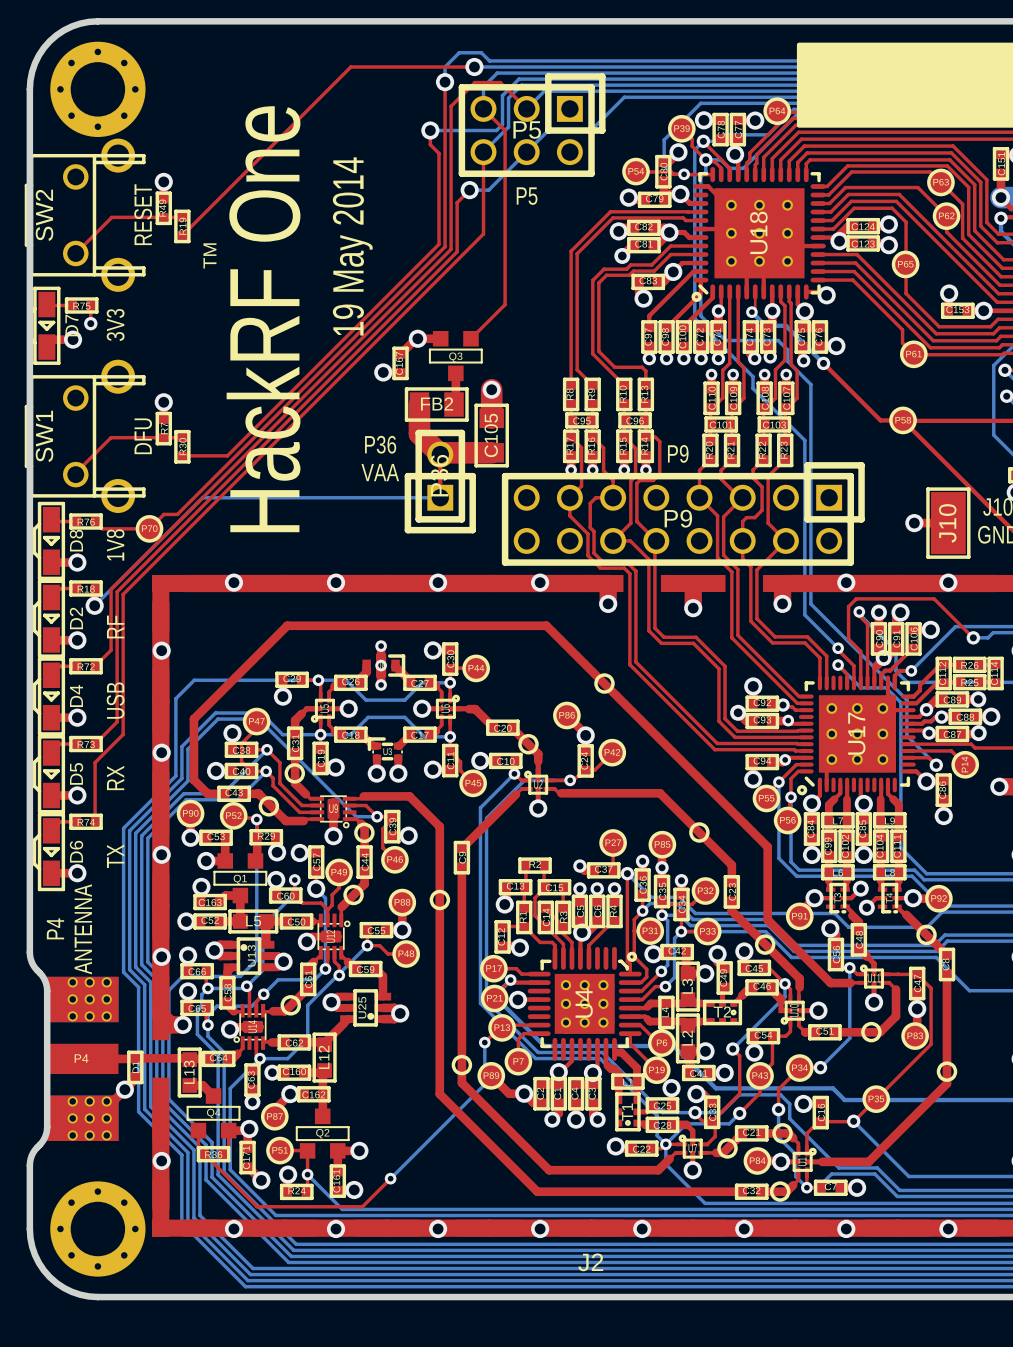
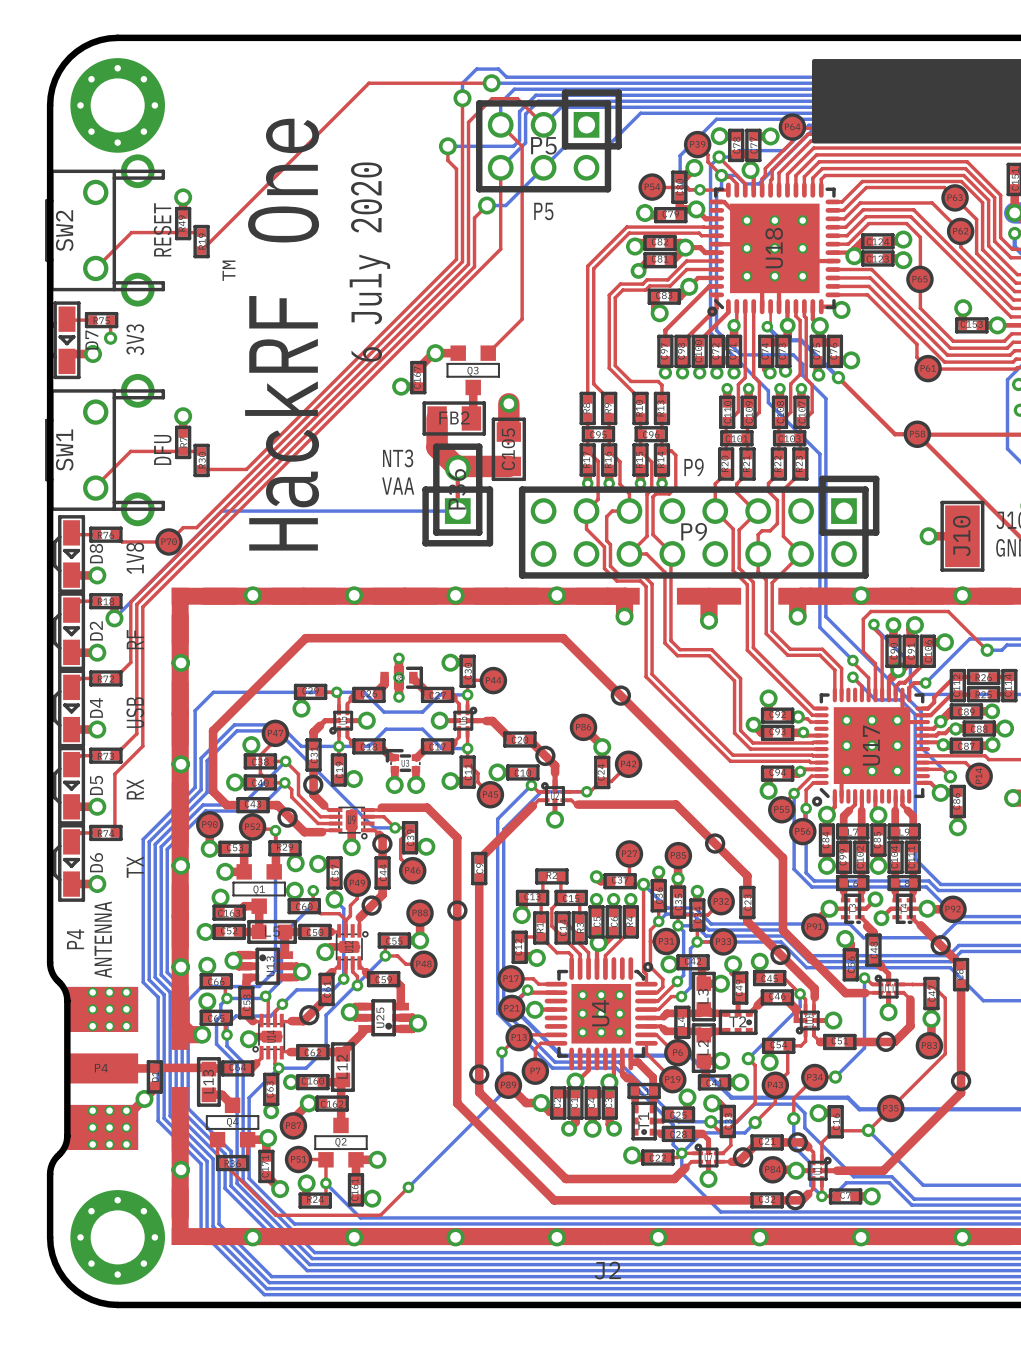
text: 19 May 2014 (352, 246) -> 6 July 2020 (369, 262)
text: P36 (380, 444) -> NT3 (398, 458)

